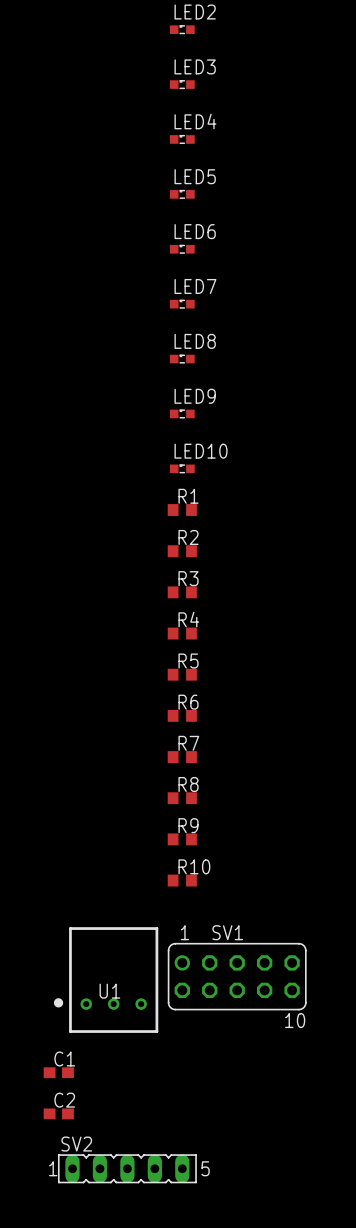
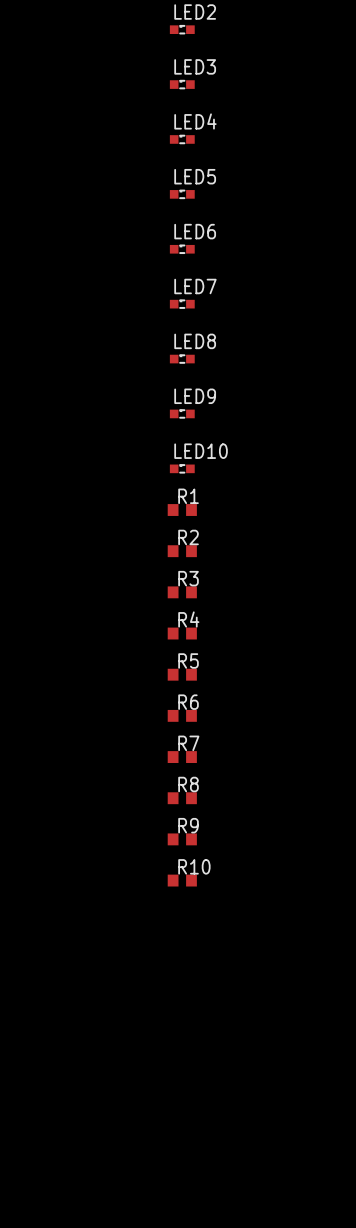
SV1: (237, 976) -> none
U1: (106, 980) -> none
C1: (58, 1072) -> none
C2: (58, 1113) -> none
SV2: (127, 1168) -> none

